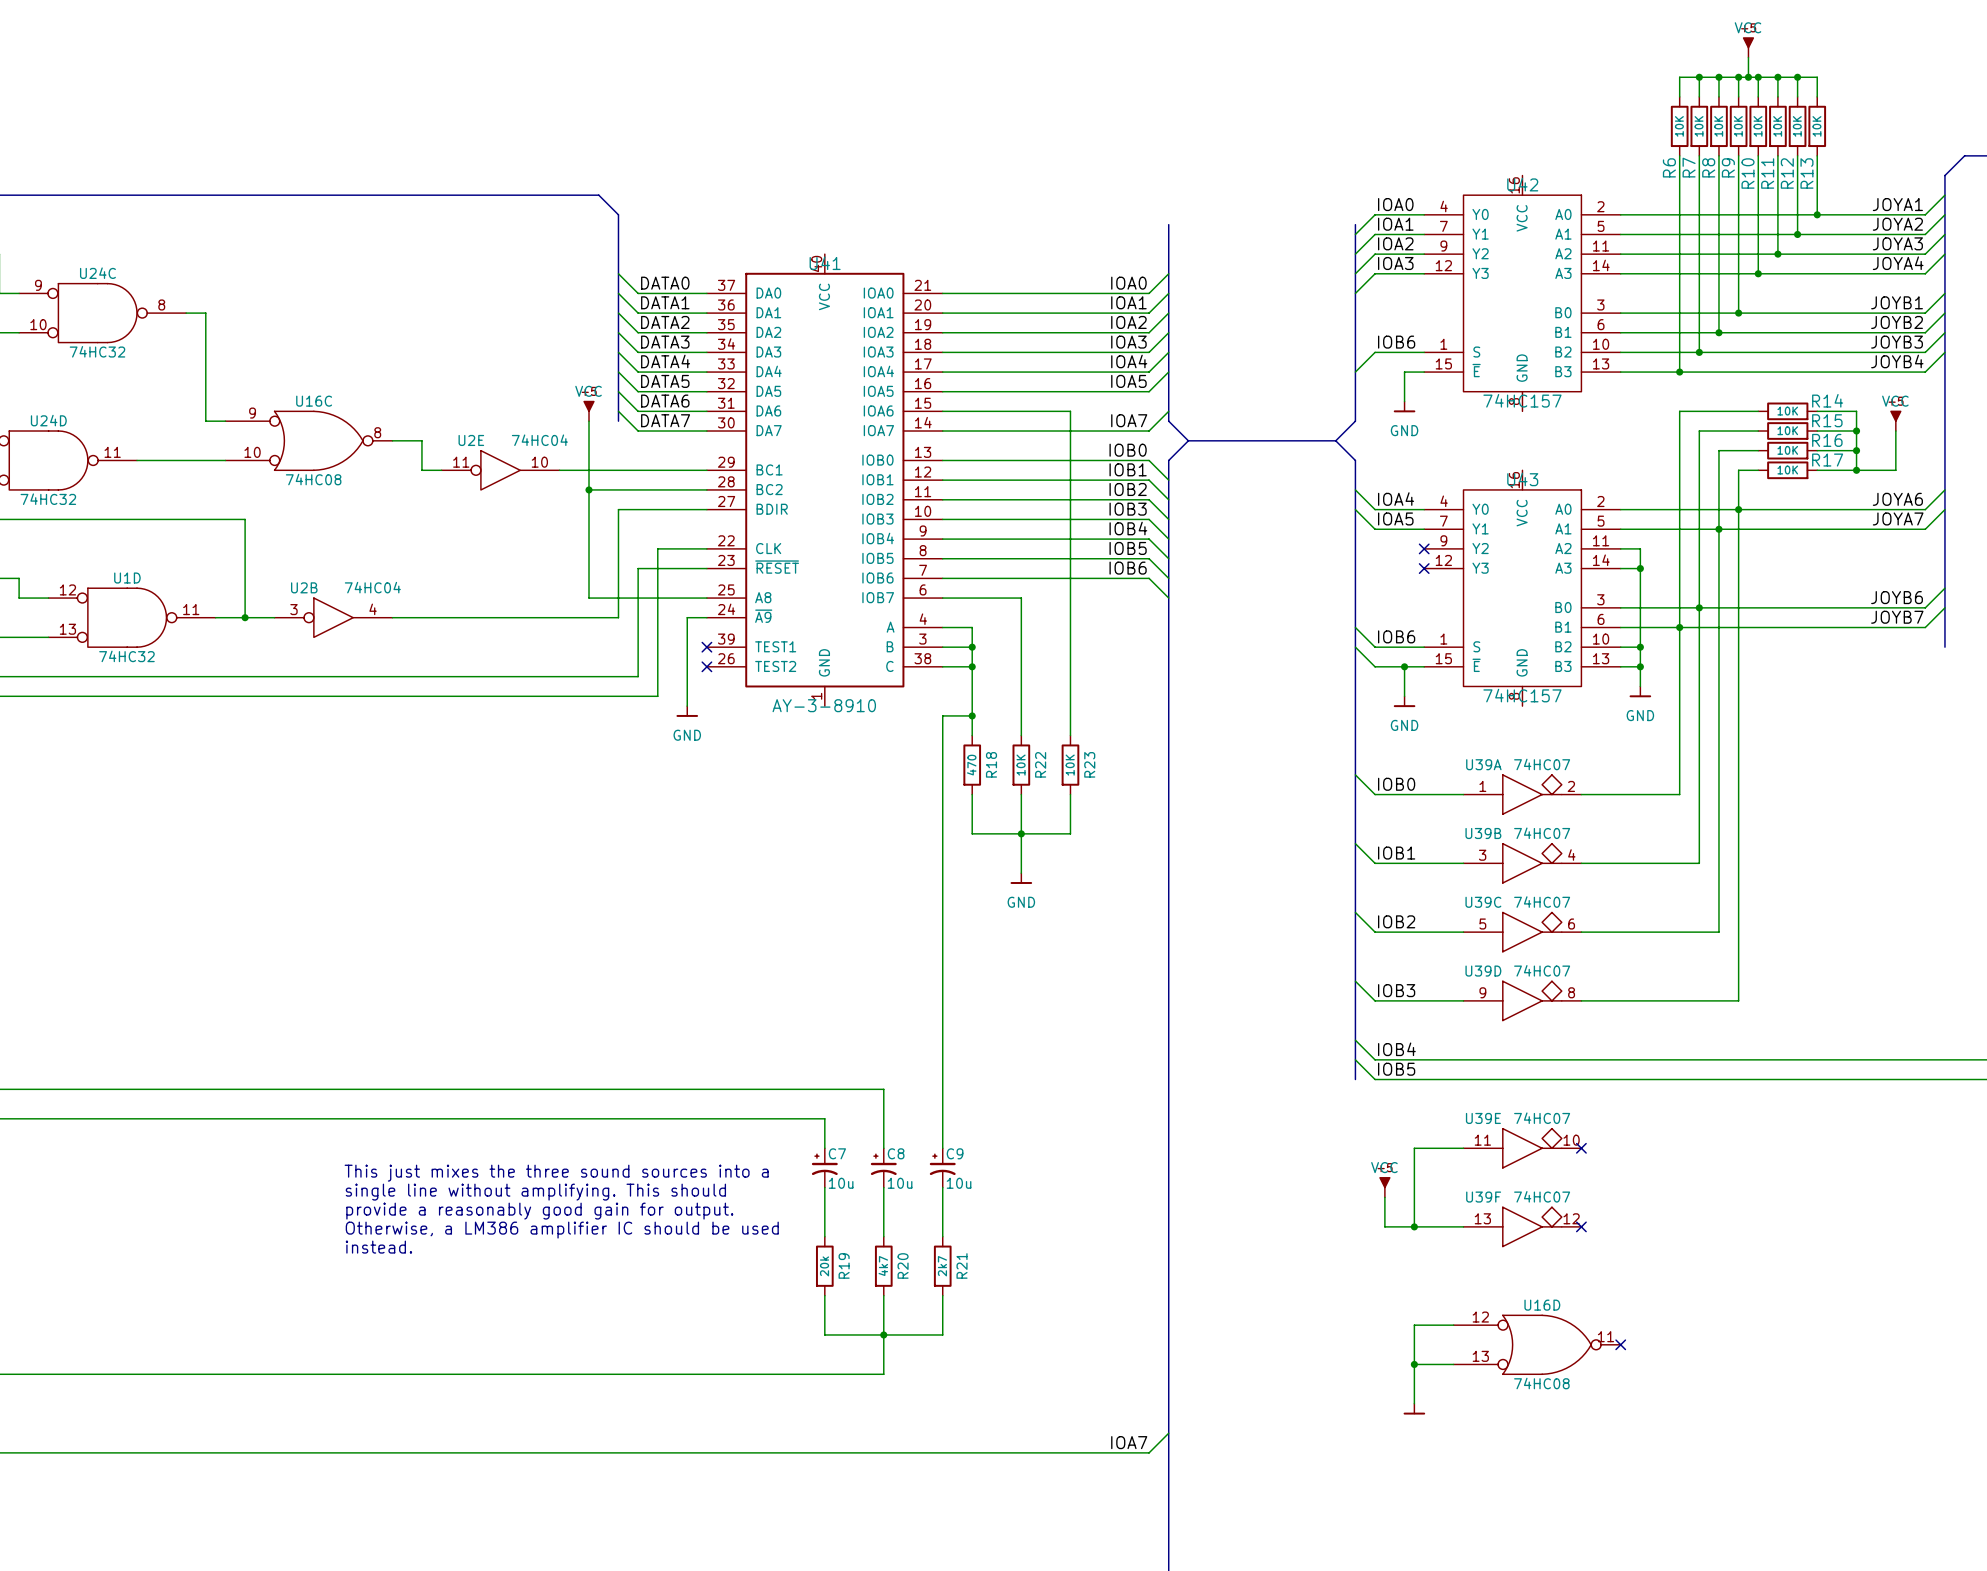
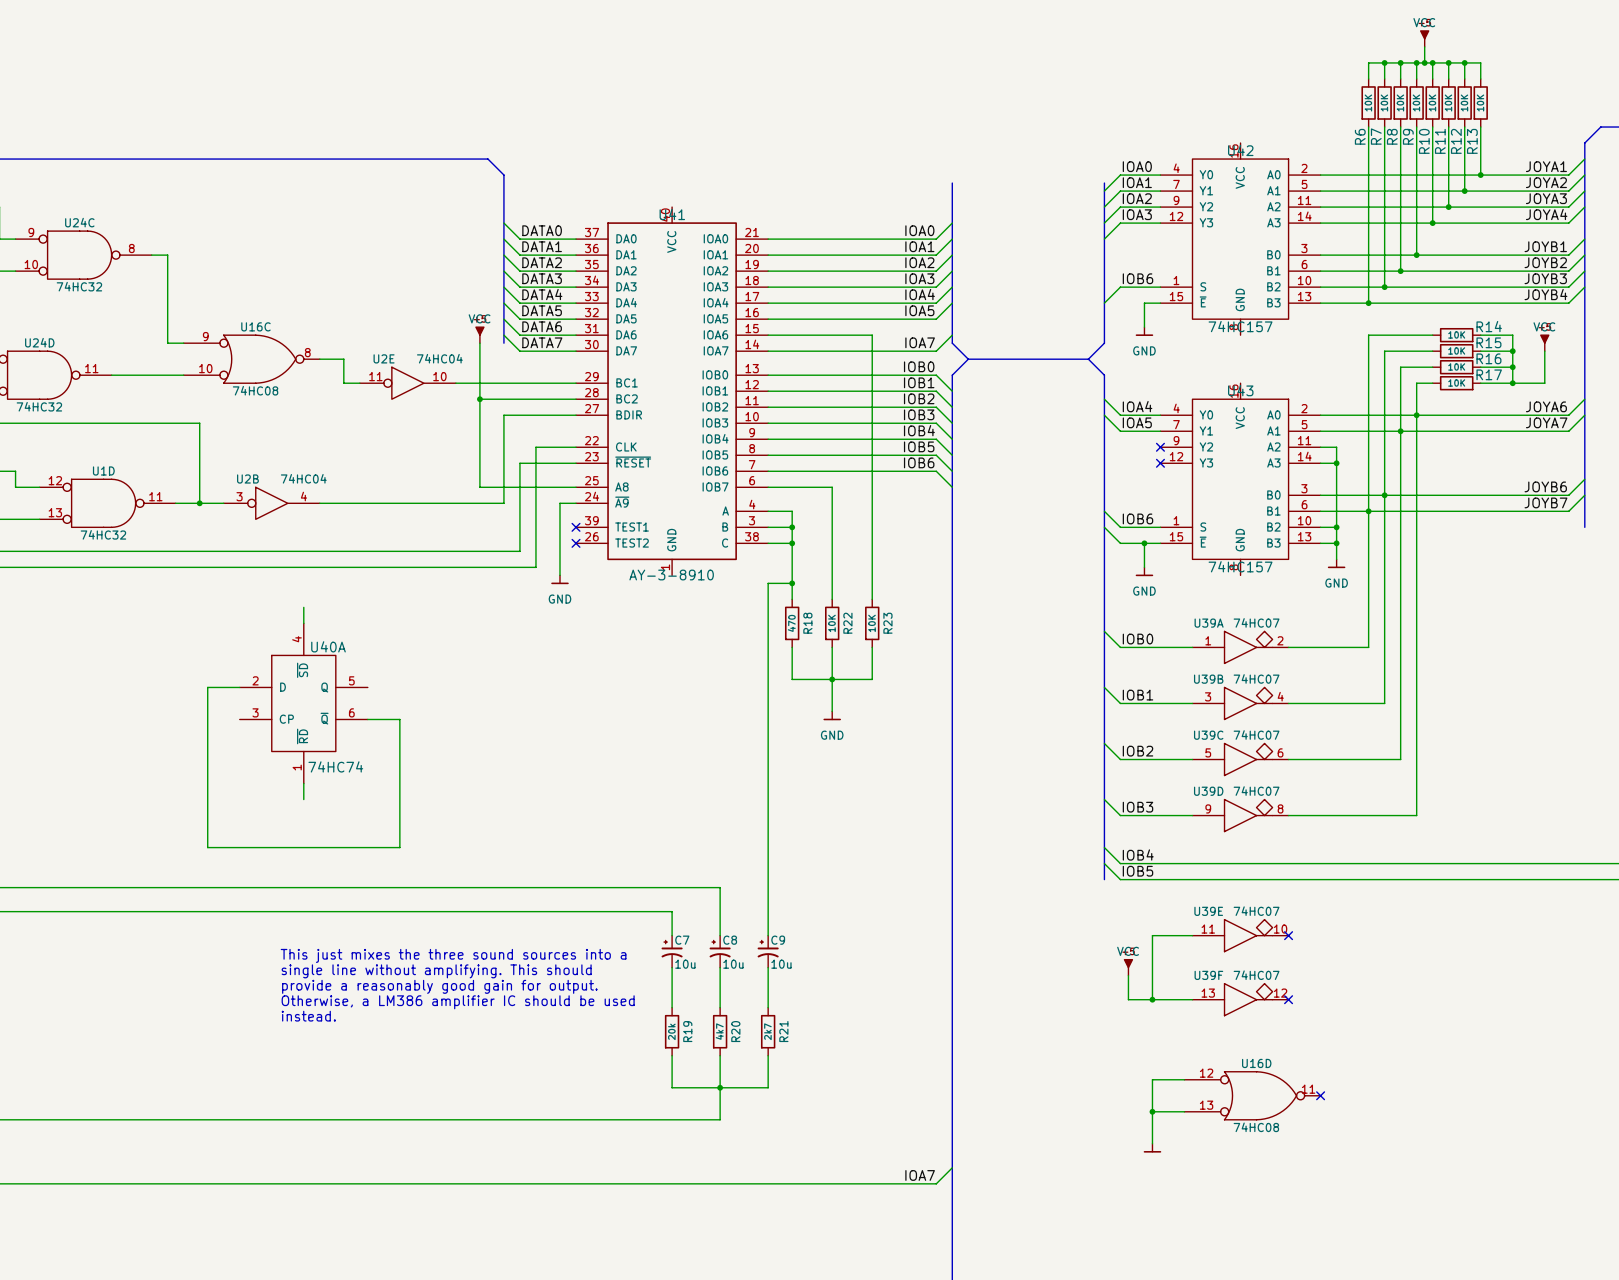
wire: none -> (303, 607) (303, 623)
wire: none -> (239, 687) (207, 687) (207, 847) (399, 847) (399, 719) (367, 719)
U40A: none -> 74HC74 (303, 703)
wire: none -> (303, 783) (303, 799)

